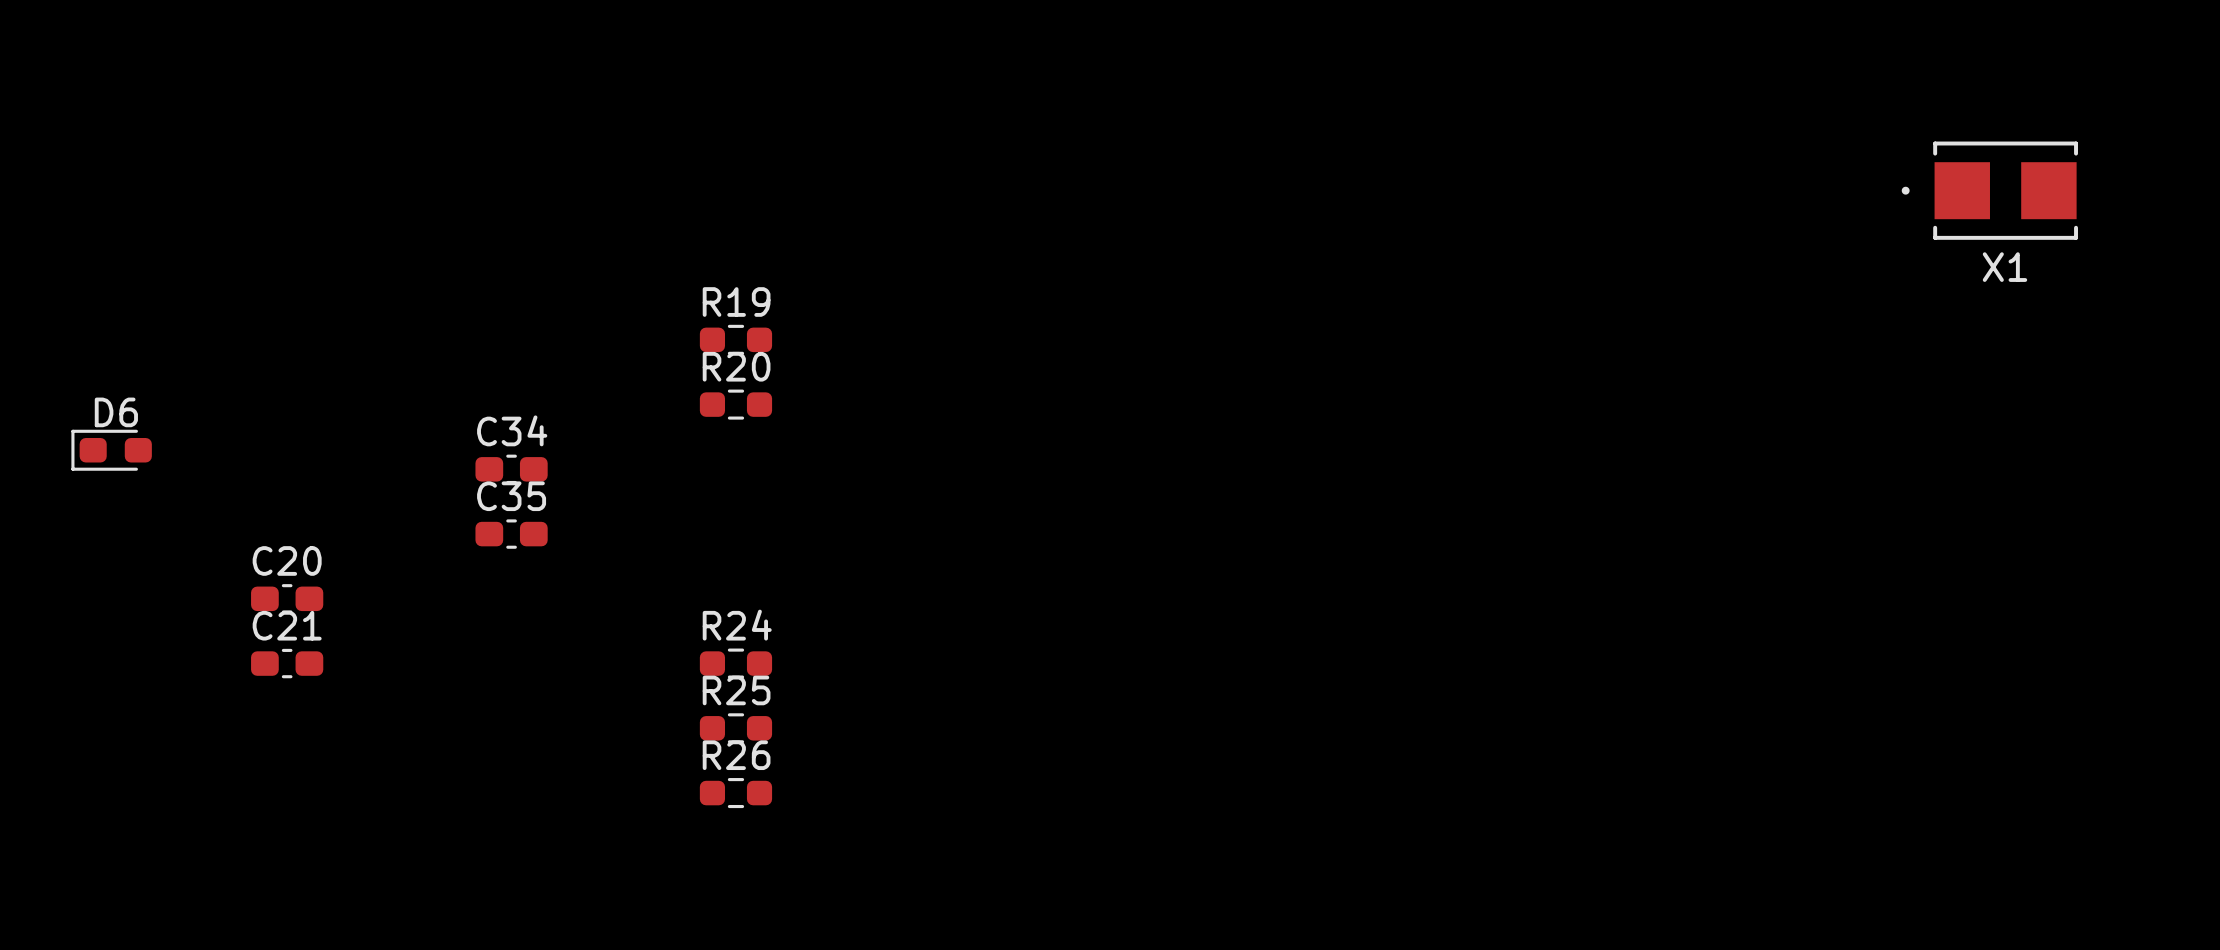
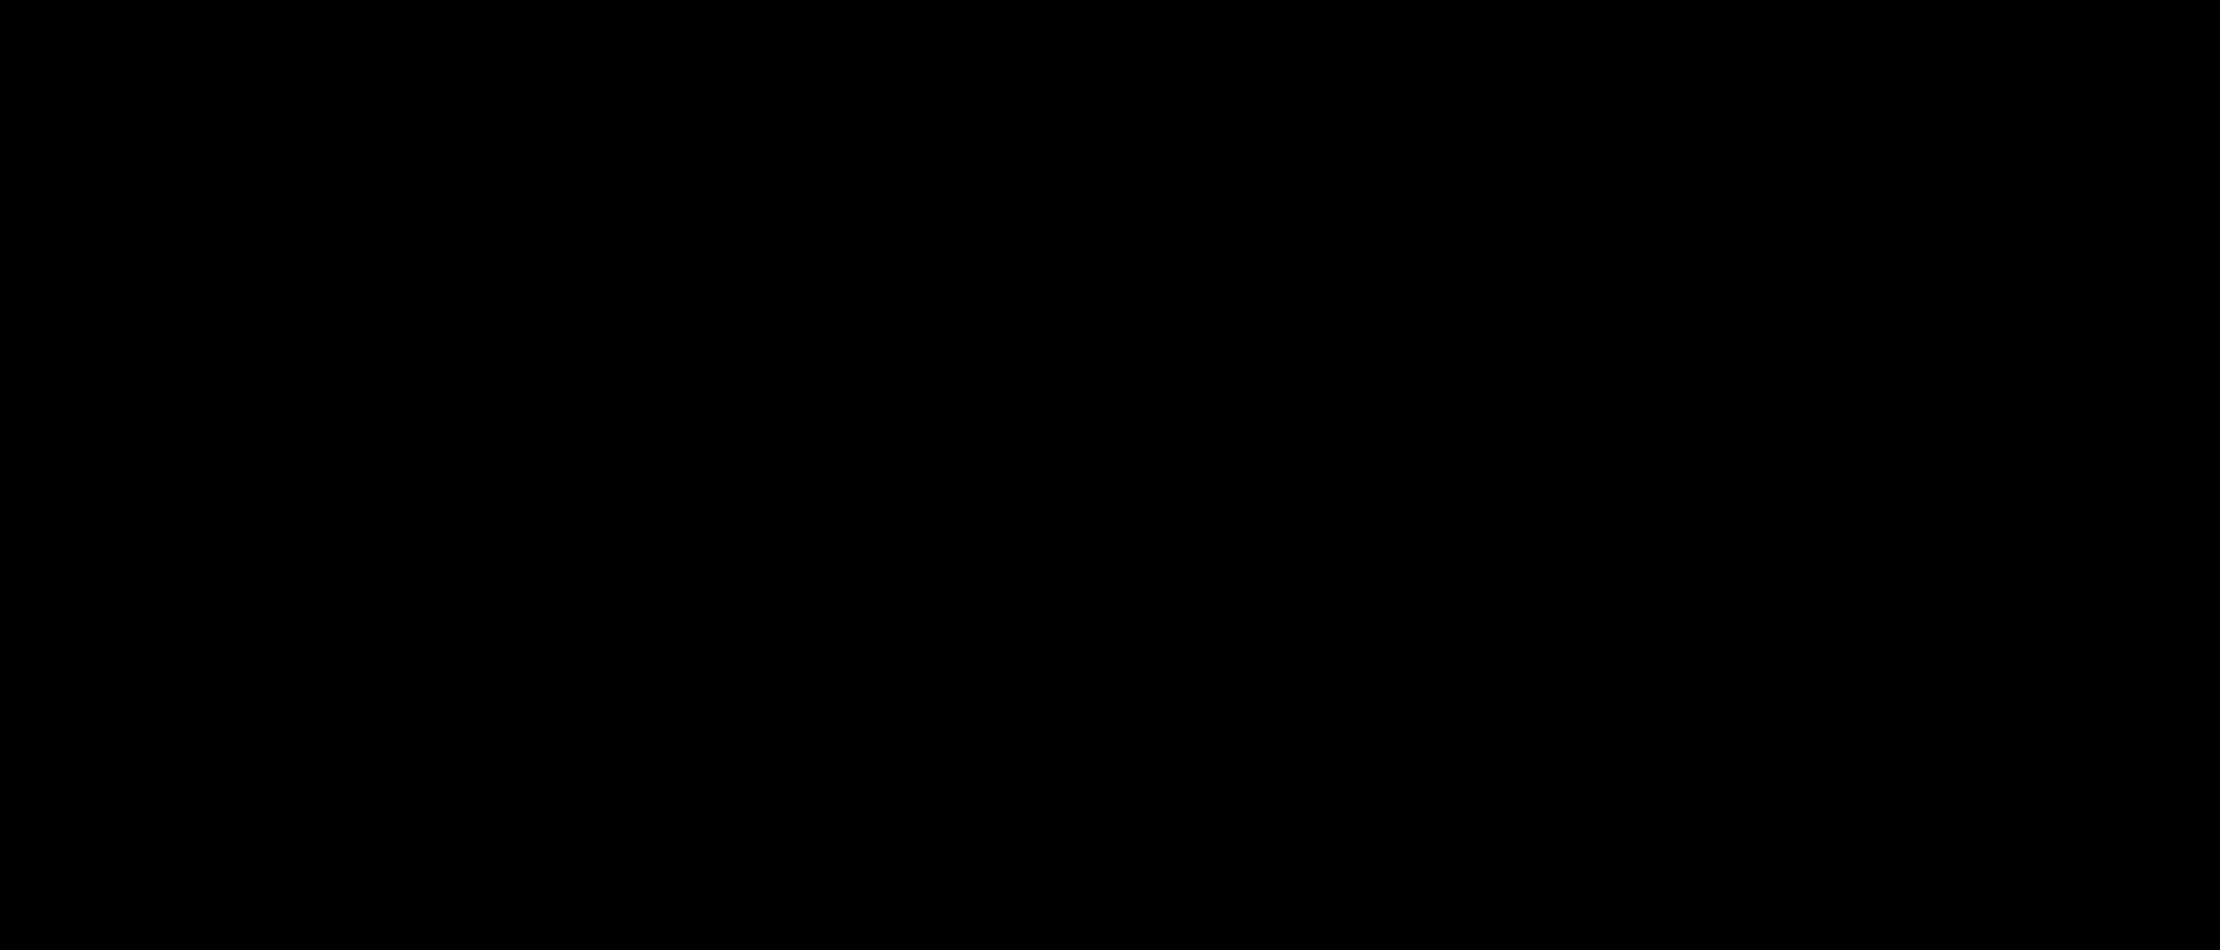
X1: (1989, 190) -> none
R19: (735, 339) -> none
R20: (735, 404) -> none
D6: (111, 450) -> none
C34: (511, 469) -> none
C35: (511, 534) -> none
C20: (287, 598) -> none
C21: (287, 663) -> none
R24: (735, 663) -> none
R25: (735, 728) -> none
R26: (735, 793) -> none

